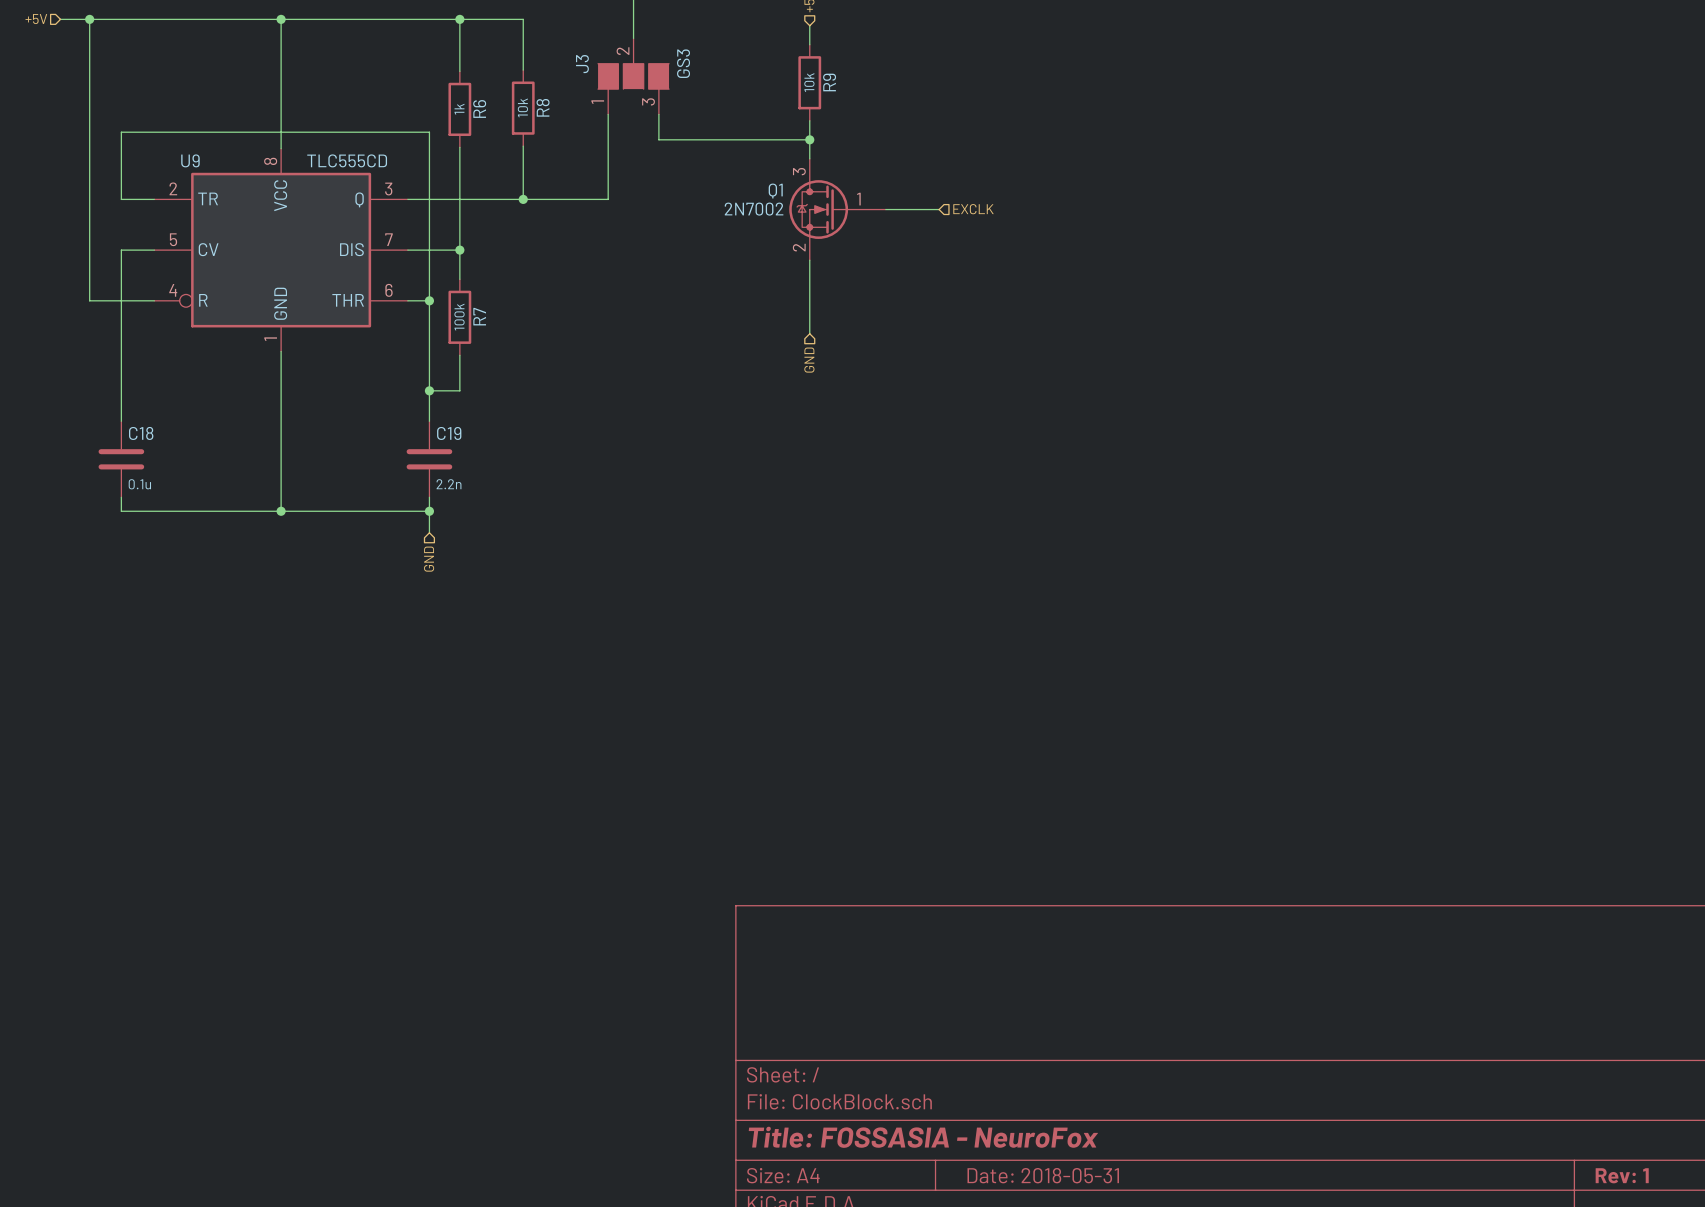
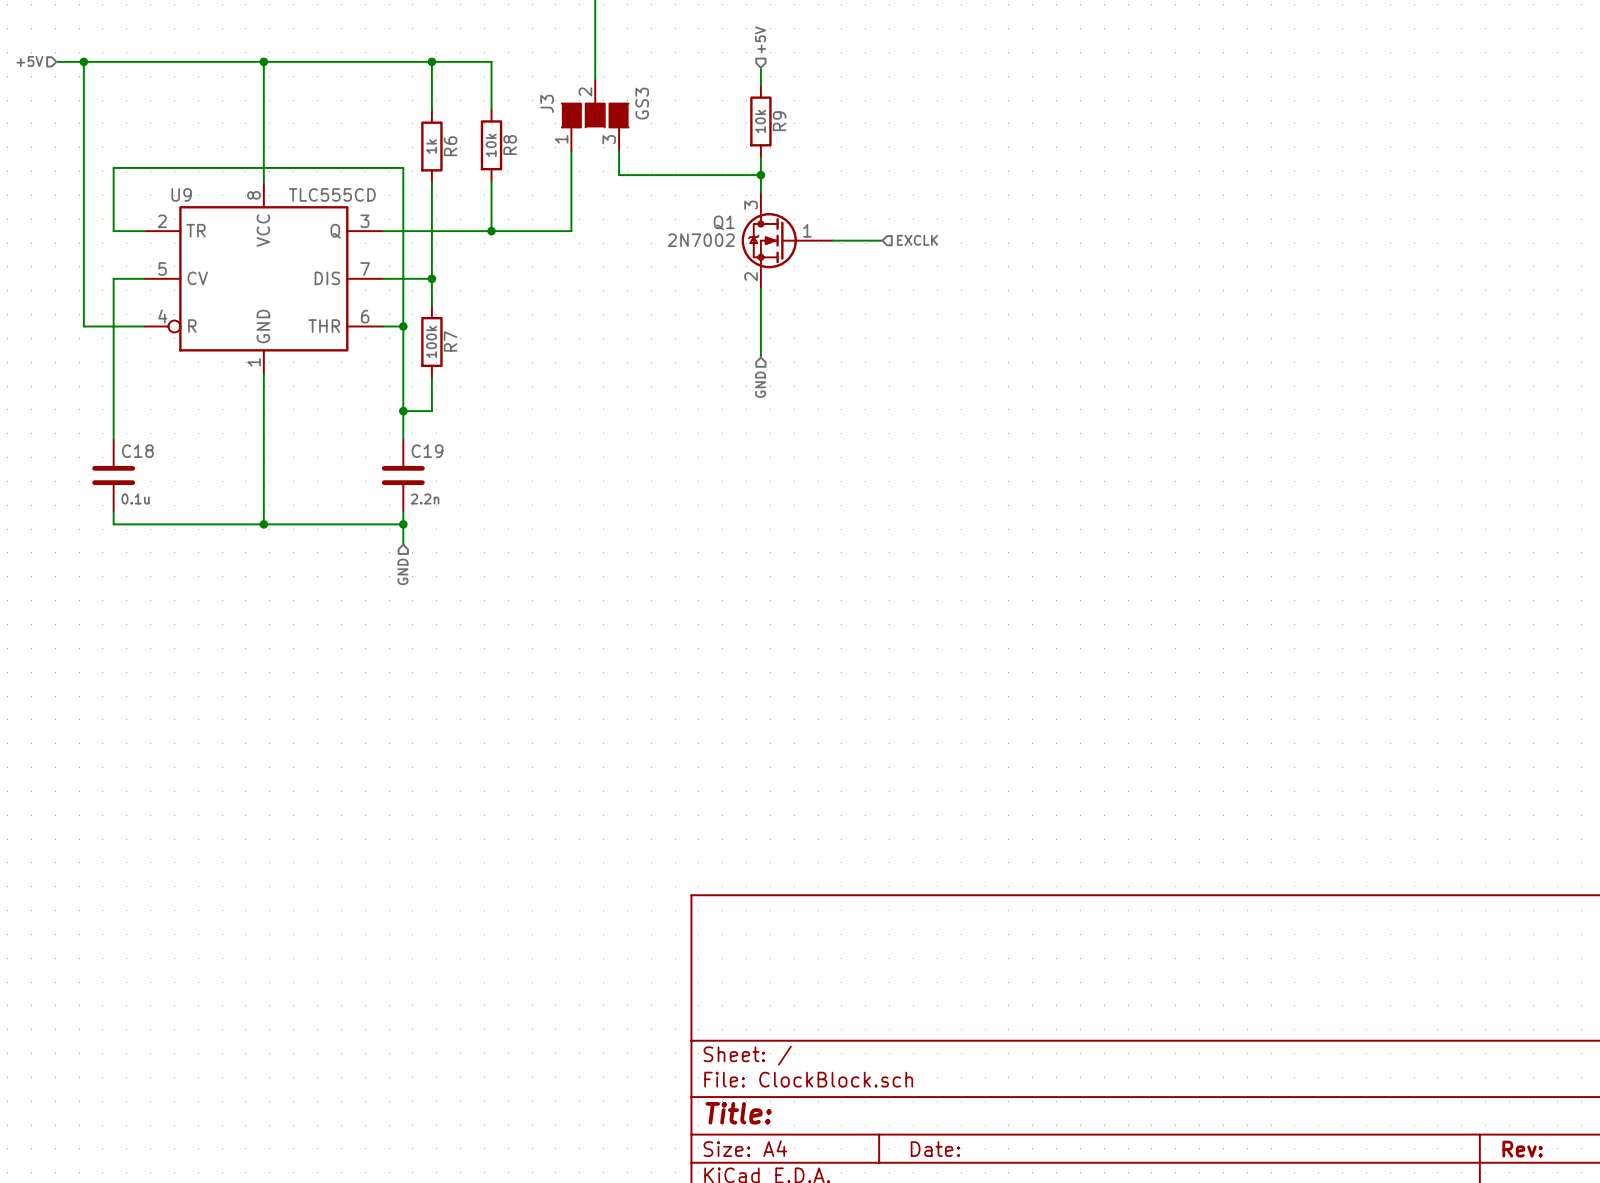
title block: Title: FOSSASIA - NeuroFox (923, 1137) -> Title: (738, 1113)
title block: Date: 2018-05-31 (1043, 1175) -> Date: (935, 1149)
title block: Rev: 1 (1622, 1175) -> Rev: (1522, 1149)

